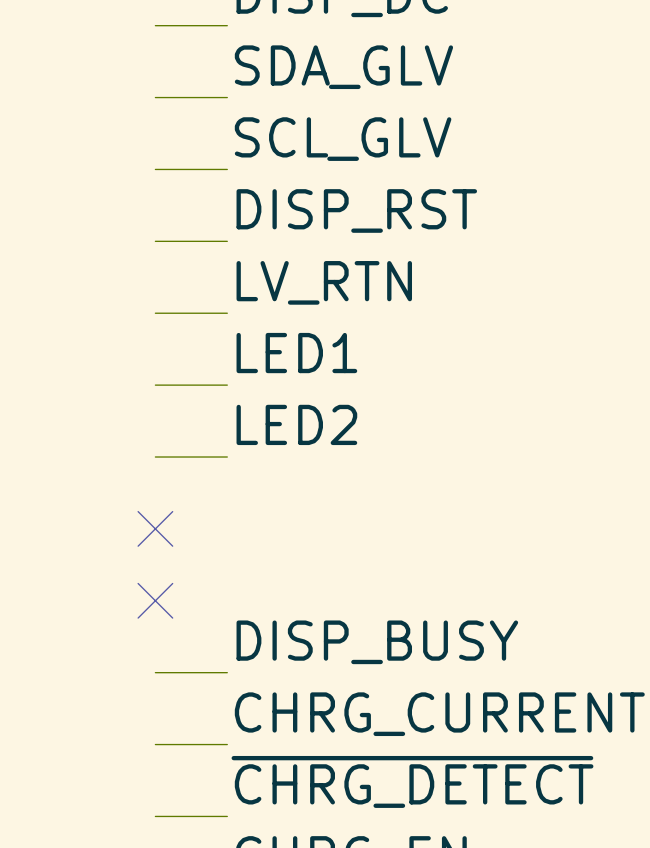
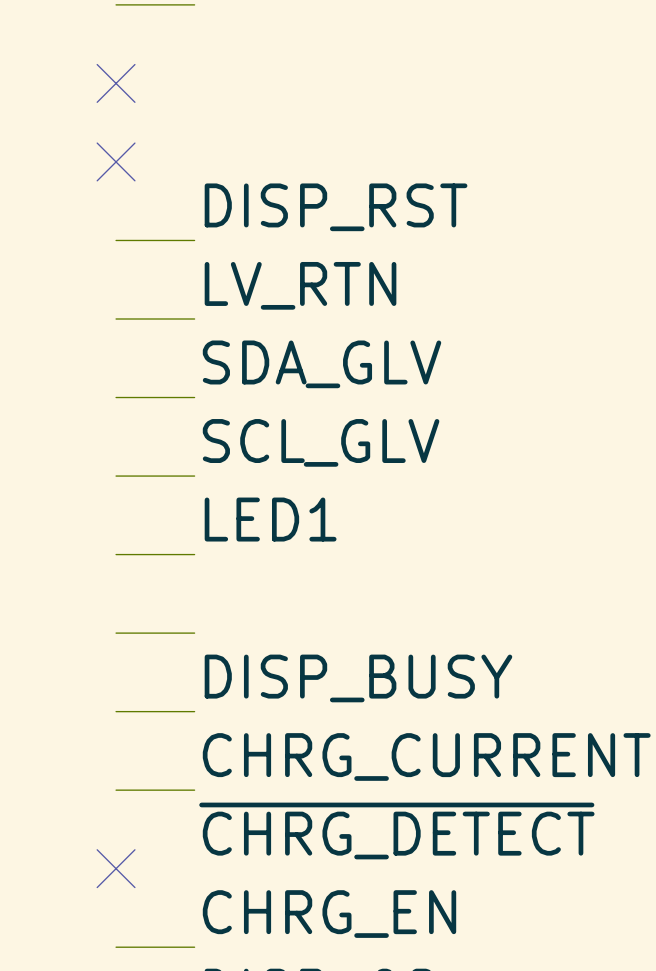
label: SDA_GLV (343, 67) -> none
wire: (155, 97) (227, 97) -> (116, 554) (194, 554)
no-connect mark: none -> (116, 83)
label: SCL_GLV (343, 139) -> none
wire: (155, 169) (227, 169) -> (116, 633) (194, 633)
no-connect mark: none -> (116, 161)
label: LED1 (296, 353) -> SDA_GLV (322, 364)
label: LED2 (296, 424) -> SCL_GLV (321, 442)
label: none -> LED1 (270, 519)
no-connect mark: (155, 528) -> none
no-connect mark: (155, 600) -> none
wire: (155, 816) (227, 816) -> none
no-connect mark: none -> (116, 868)

